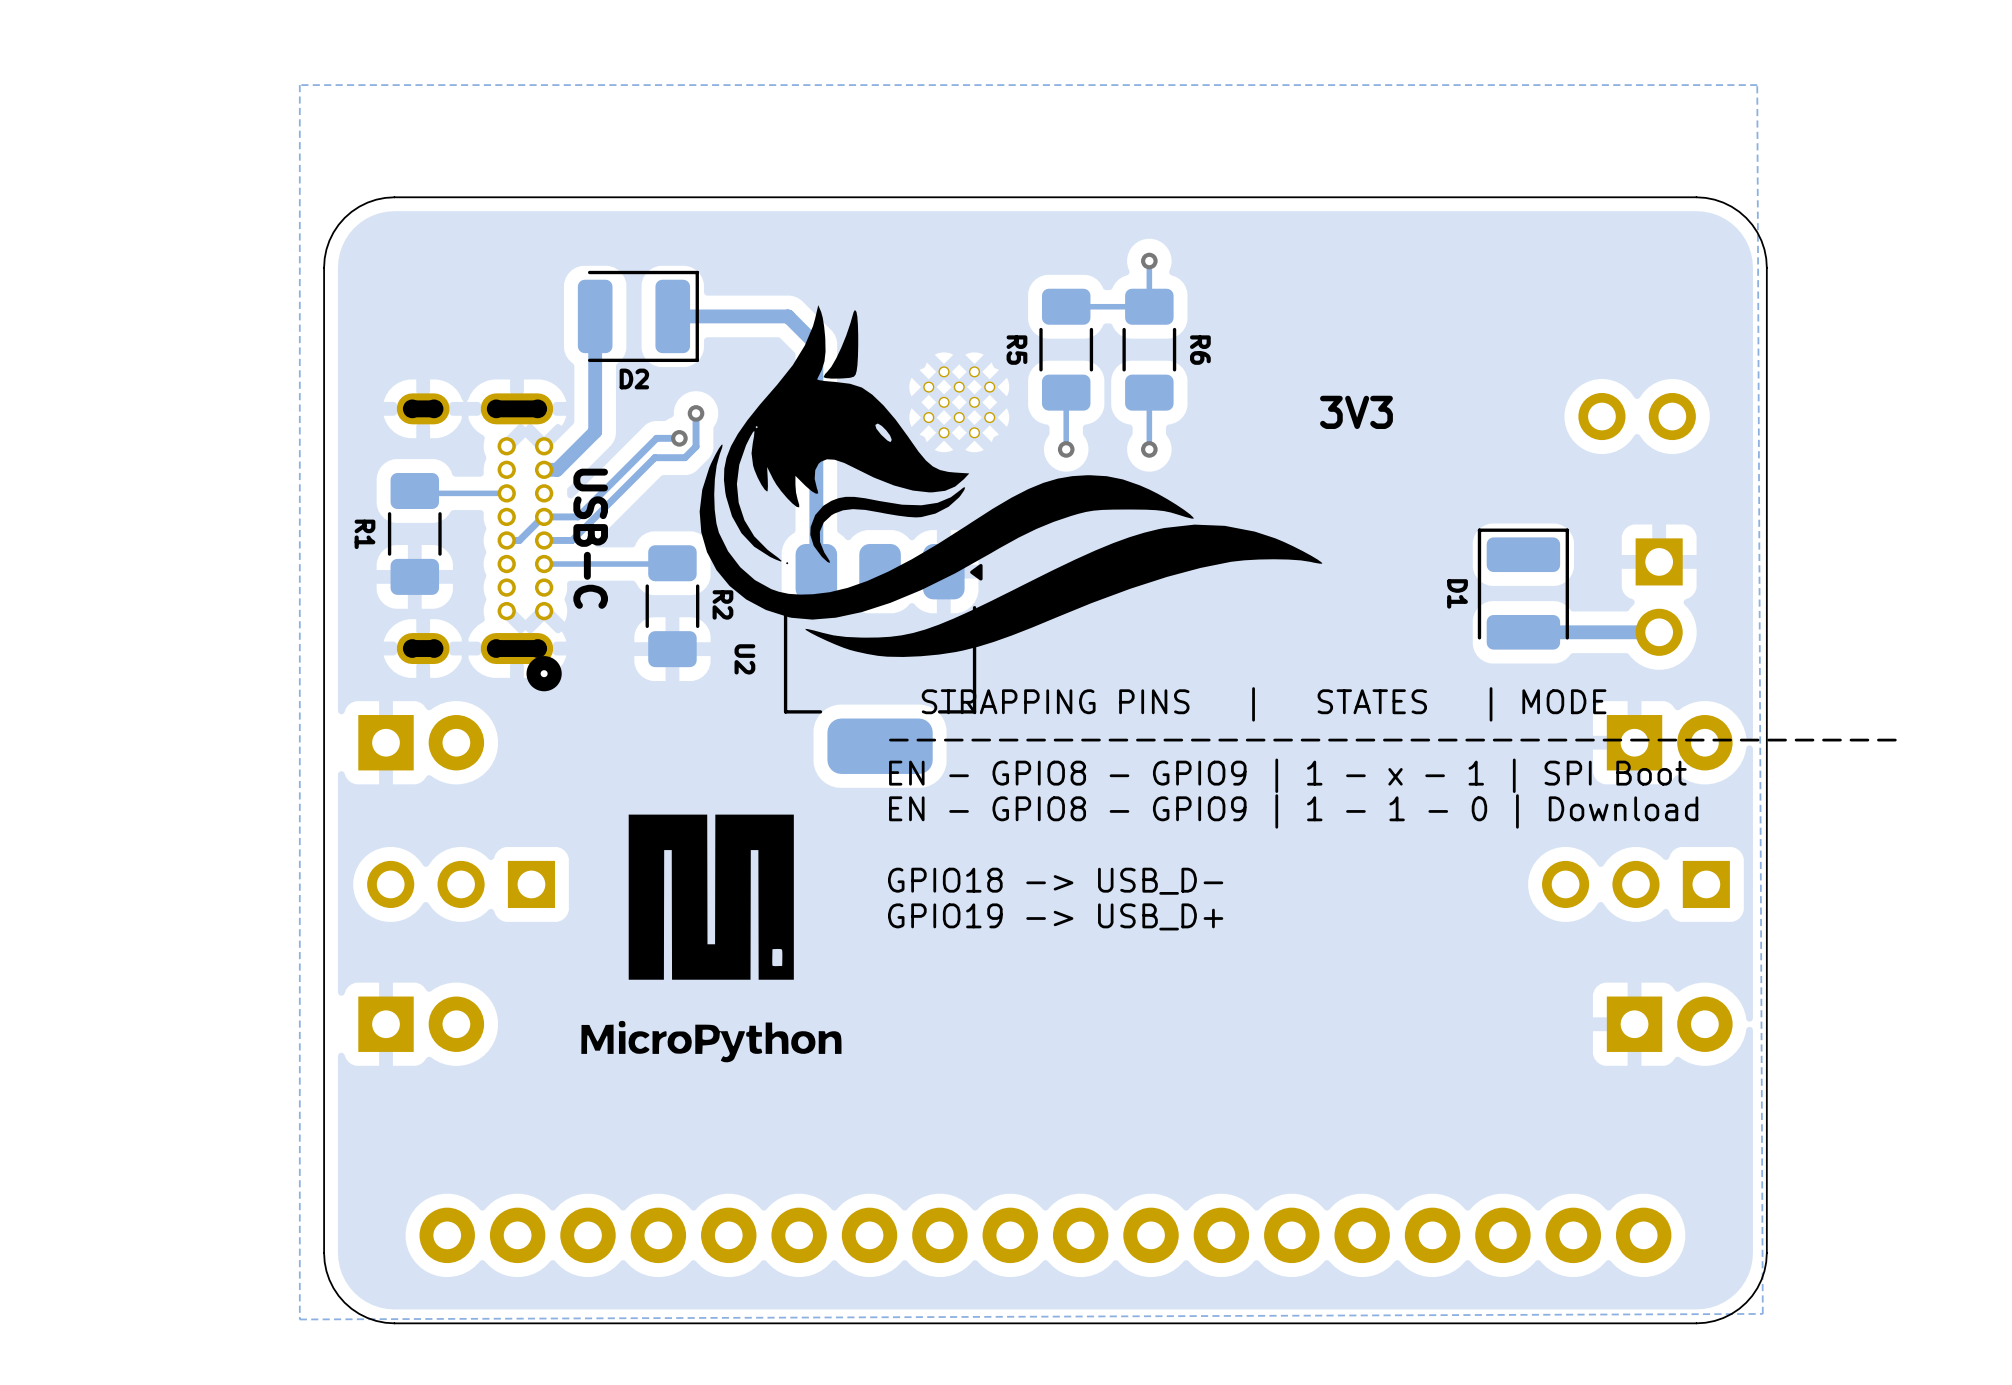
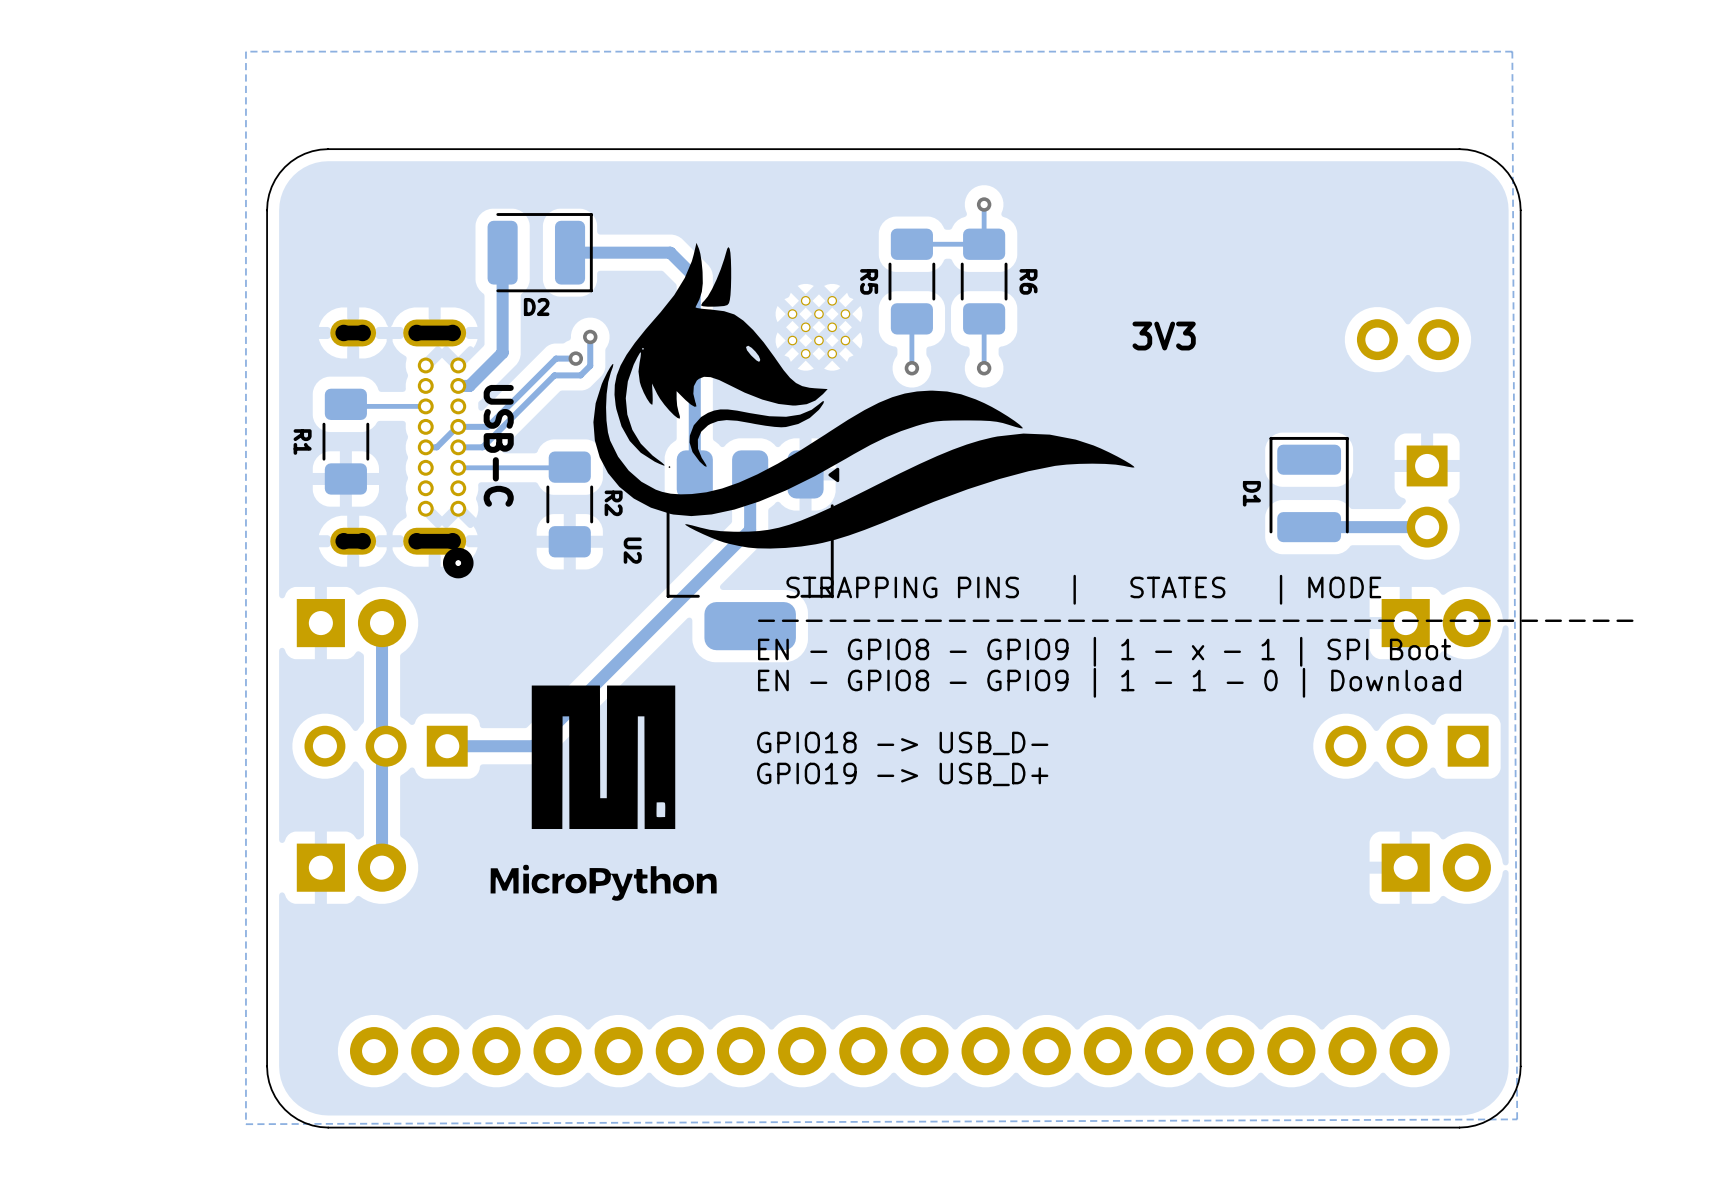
track: none -> (750, 474) (750, 529) (533, 746) (447, 746)
track: none -> (382, 623) (382, 742) (386, 746) (382, 750) (382, 867)

